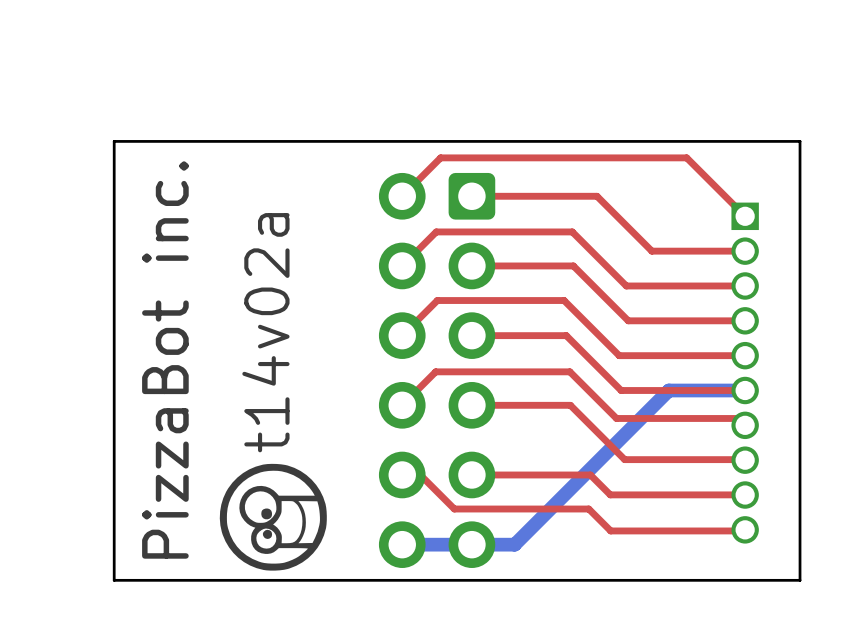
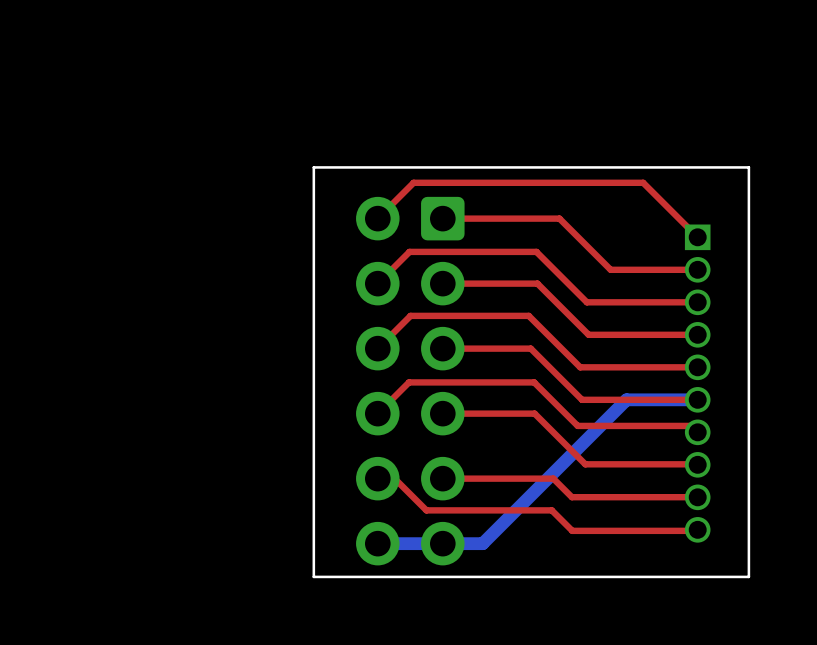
board edge: (333, 141) (114, 141) (114, 580) (333, 580) -> (313, 167) (313, 576)
text: t14v02a (265, 332) -> none
text: PizzaBot inc. (165, 360) -> none
drawing: [219, 463, 327, 571] -> none

